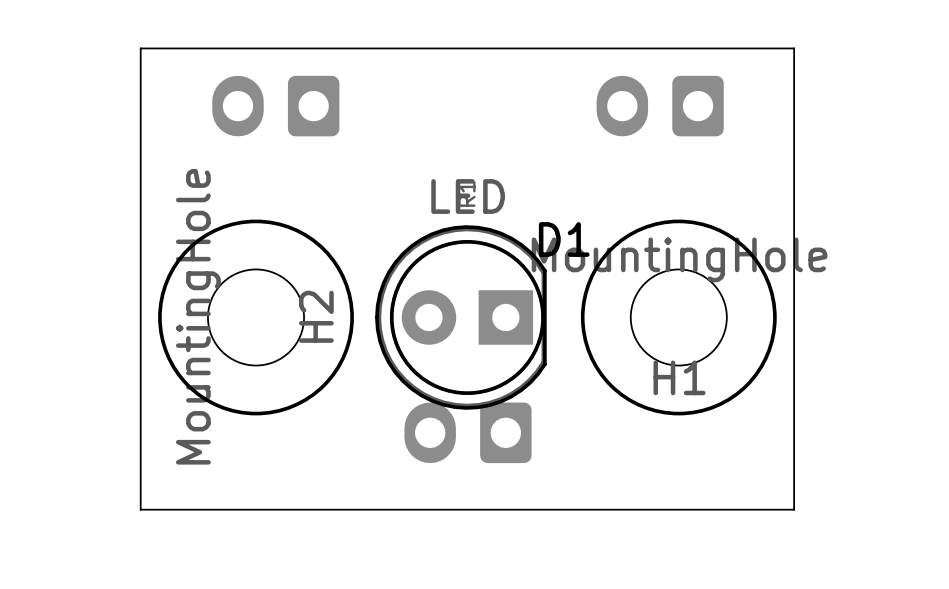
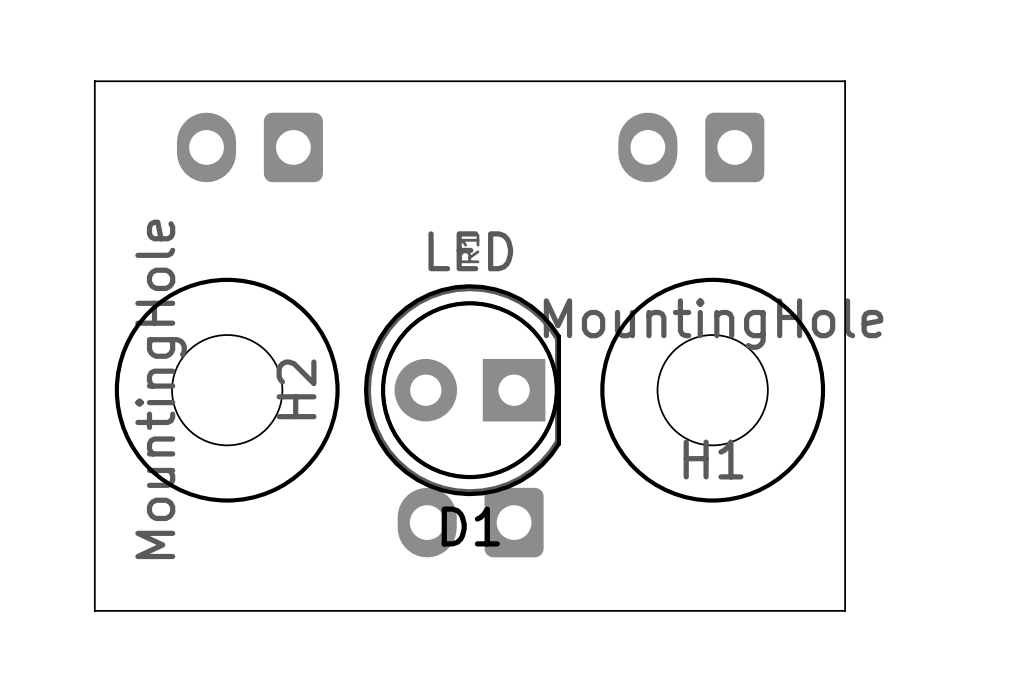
D1 name position: D1 (564, 239) -> D1 (470, 526)

